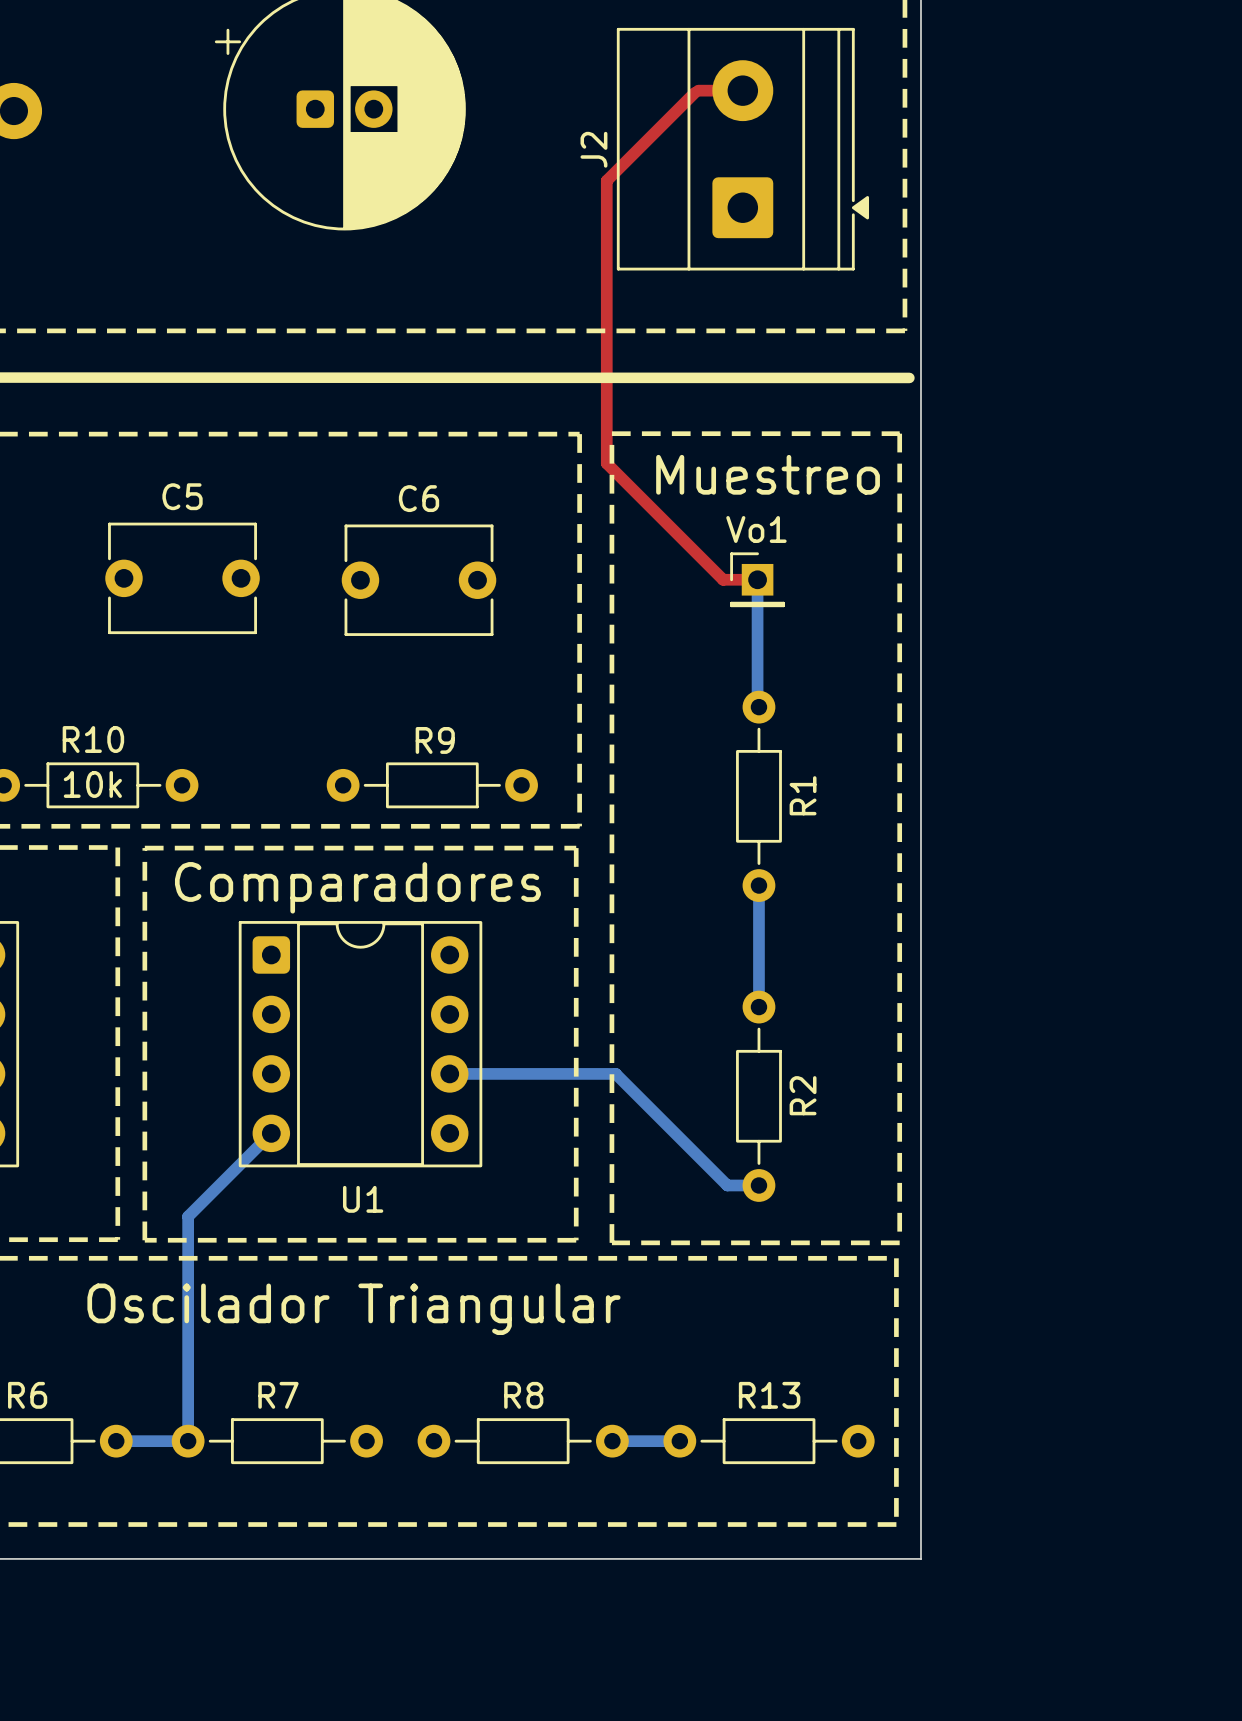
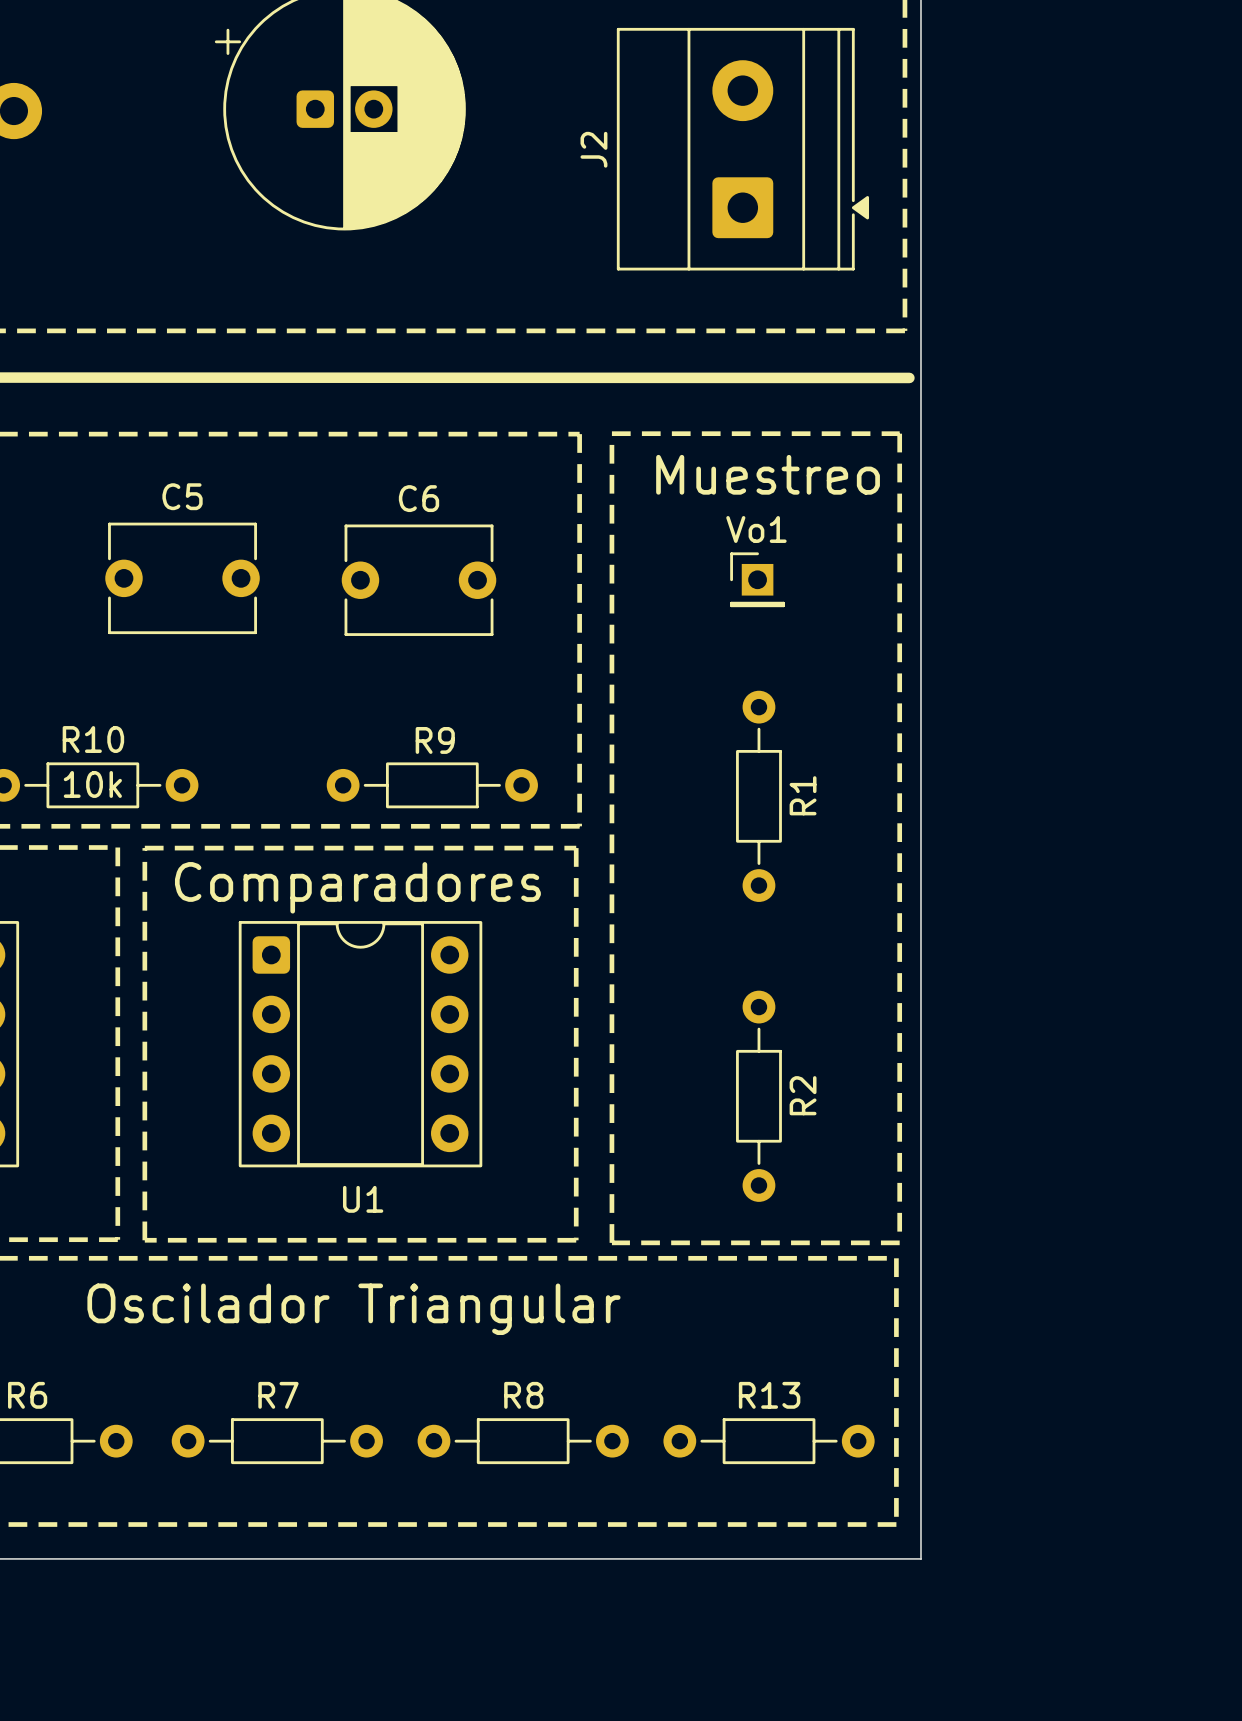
top track: (742, 90) (698, 90) (694, 93) (606, 180) (606, 463) (723, 579) (757, 579) -> none
bottom track: (757, 579) (758, 707) -> none
bottom track: (758, 885) (758, 1007) -> none
bottom track: (449, 1073) (615, 1073) (727, 1185) (758, 1185) -> none
bottom track: (271, 1133) (188, 1216) (188, 1441) (116, 1441) -> none
bottom track: (612, 1441) (679, 1441) -> none

